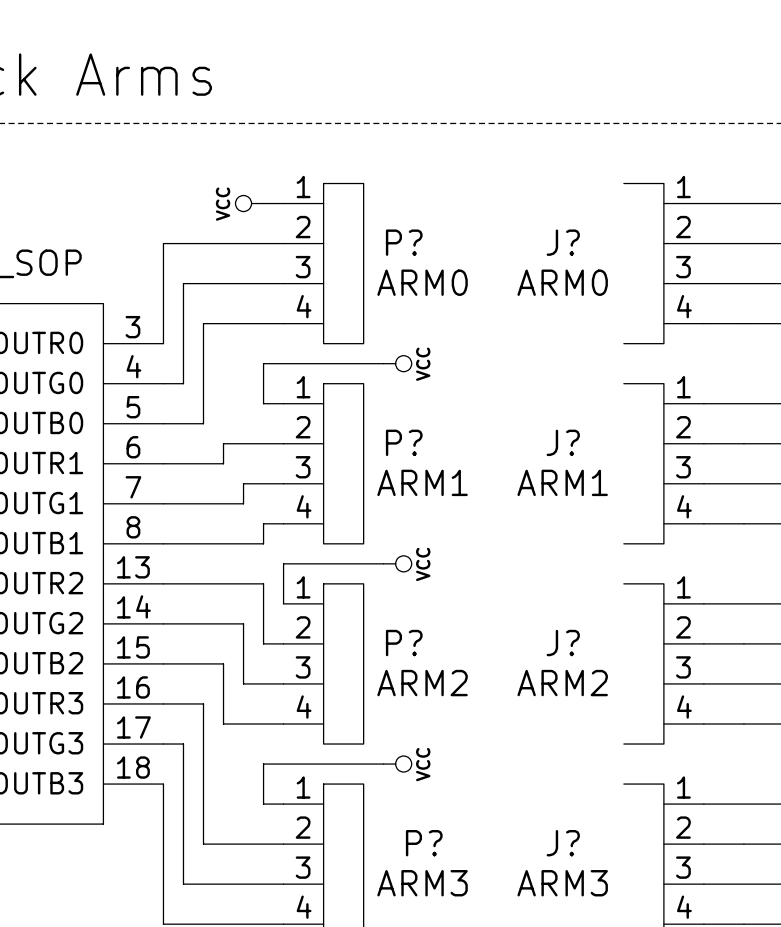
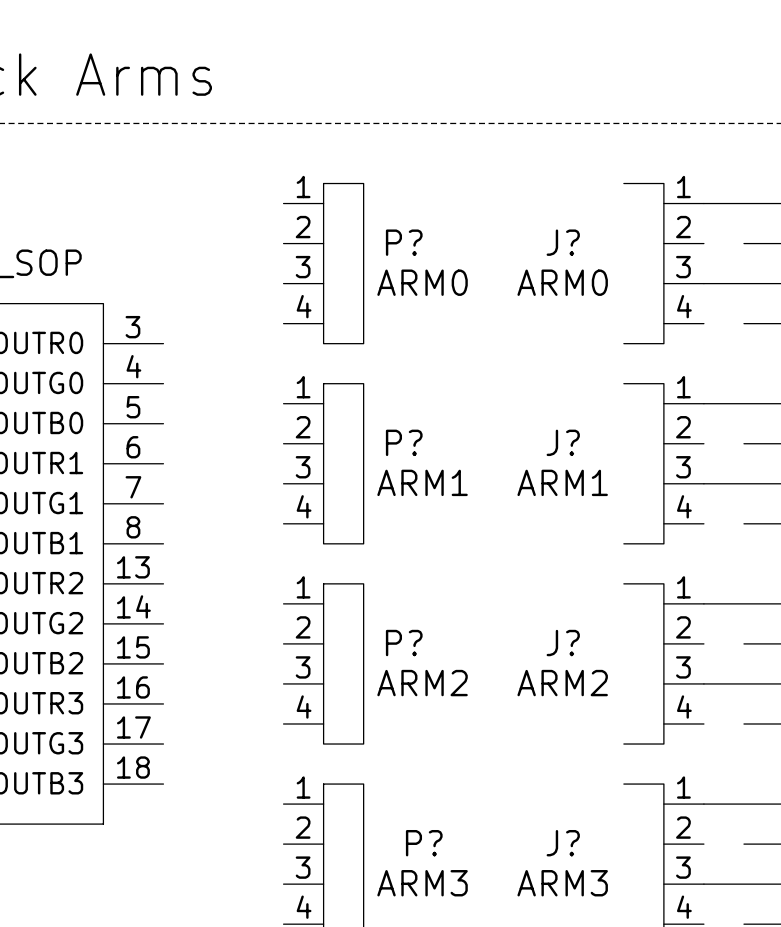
power symbol: VCC (249, 203) -> none
wire: (263, 203) (283, 203) -> none
wire: (283, 243) (163, 243) (163, 343) -> none
wire: (703, 243) (743, 243) -> none
wire: (283, 283) (183, 283) (183, 383) (163, 383) -> none
wire: (283, 323) (203, 323) (203, 423) (163, 423) -> none
wire: (703, 323) (743, 323) -> none
wire: (383, 363) (263, 363) (263, 403) (283, 403) -> none
power symbol: VCC (397, 363) -> none
wire: (283, 443) (223, 443) (223, 463) (163, 463) -> none
wire: (703, 443) (743, 443) -> none
wire: (283, 483) (243, 483) (243, 503) (163, 503) -> none
wire: (283, 523) (263, 523) (263, 543) (163, 543) -> none
wire: (703, 523) (743, 523) -> none
wire: (383, 563) (283, 563) (283, 603) -> none
power symbol: VCC (397, 563) -> none
wire: (163, 583) (263, 583) (263, 643) (283, 643) -> none
wire: (163, 623) (243, 623) (243, 683) (283, 683) -> none
wire: (703, 643) (743, 643) -> none
wire: (163, 663) (223, 663) (223, 723) (283, 723) -> none
wire: (163, 703) (203, 703) (203, 844) (283, 844) -> none
wire: (703, 723) (743, 723) -> none
wire: (163, 744) (183, 744) (183, 884) (283, 884) -> none
wire: (383, 764) (263, 764) (263, 804) (283, 804) -> none
power symbol: VCC (397, 764) -> none
wire: (163, 784) (163, 924) (283, 924) -> none
wire: (703, 844) (743, 844) -> none
wire: (703, 924) (743, 924) -> none

